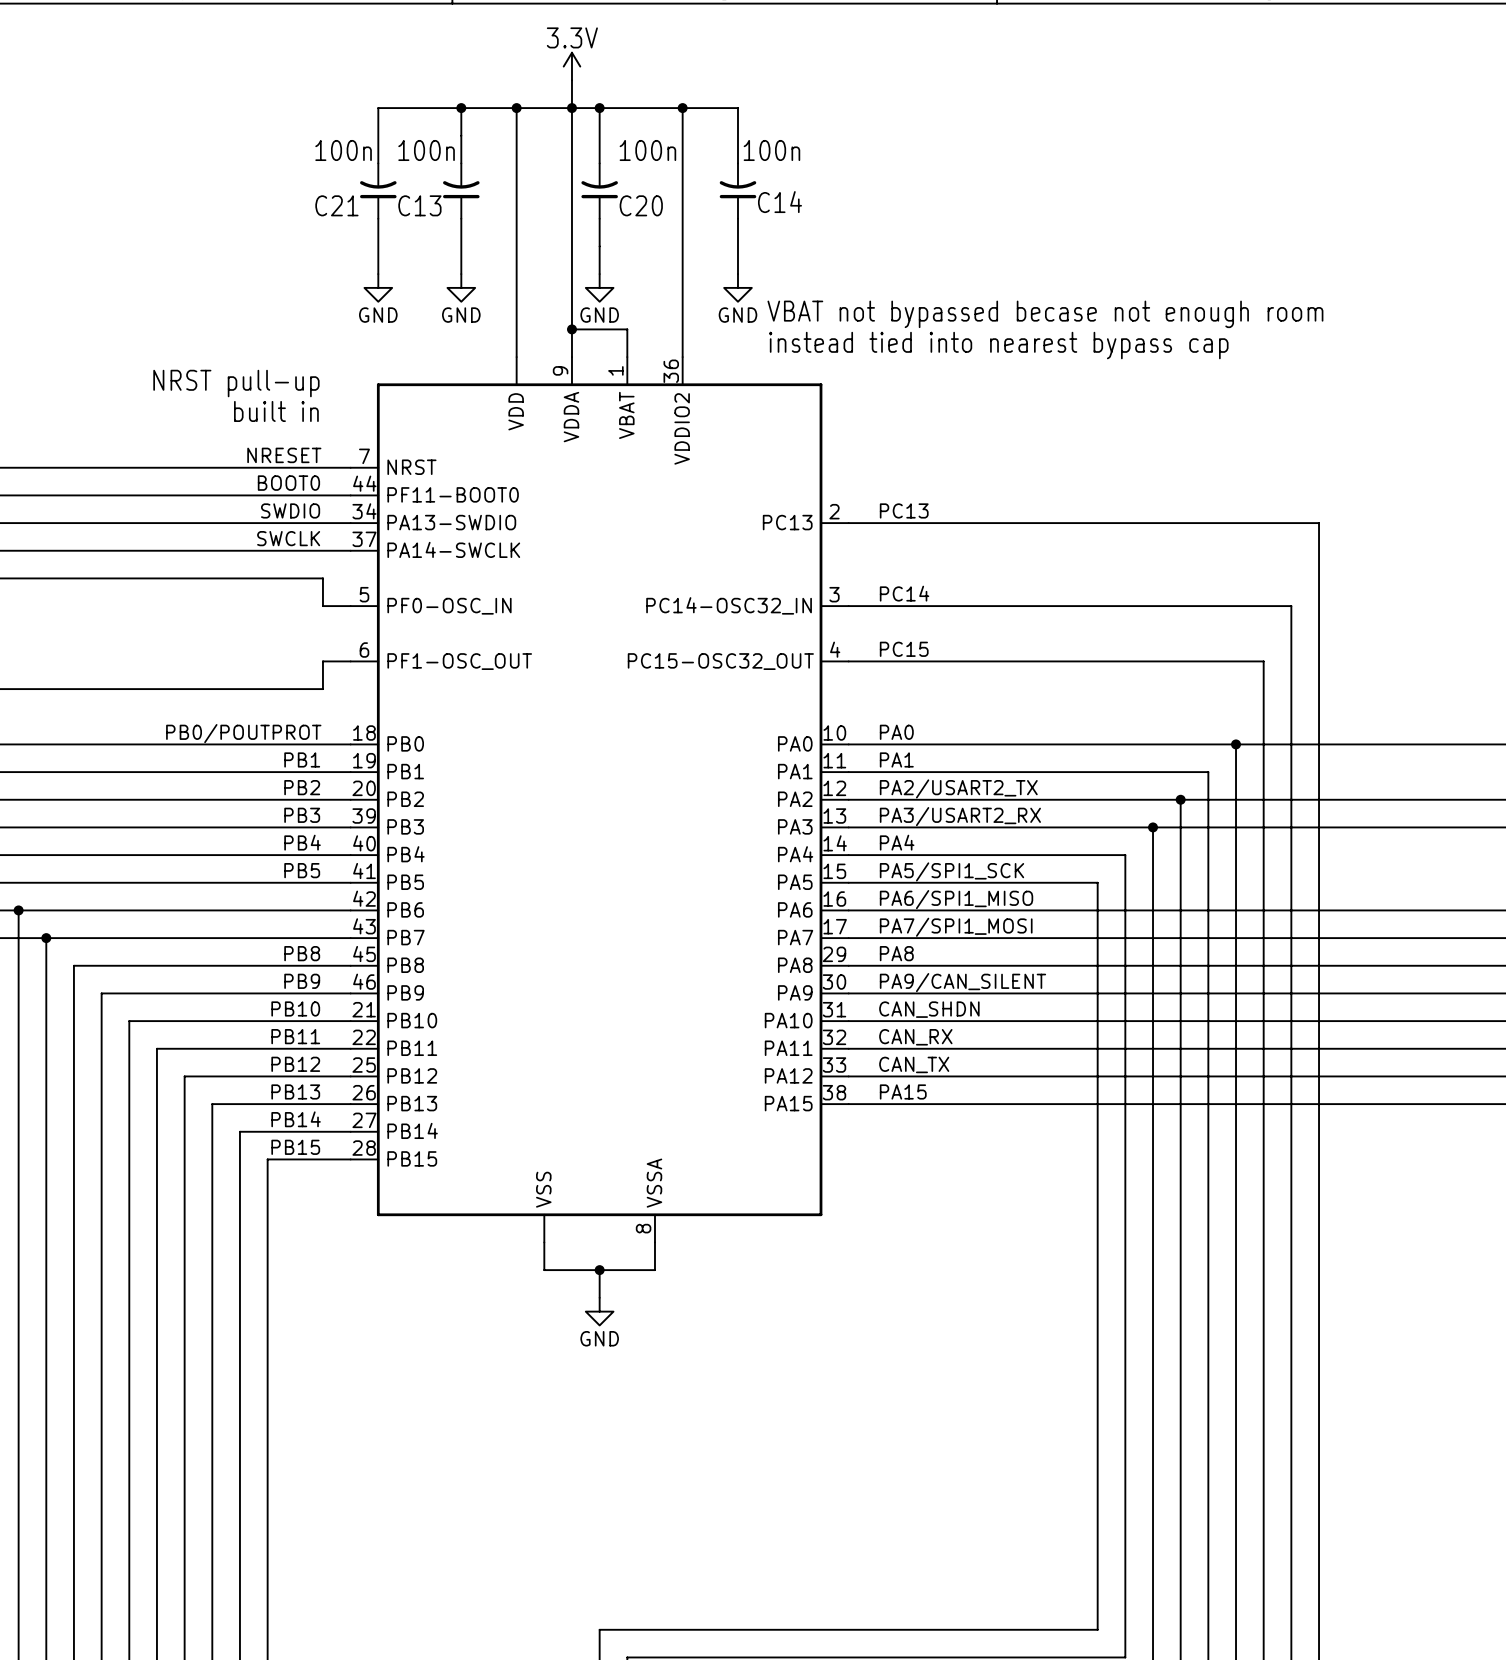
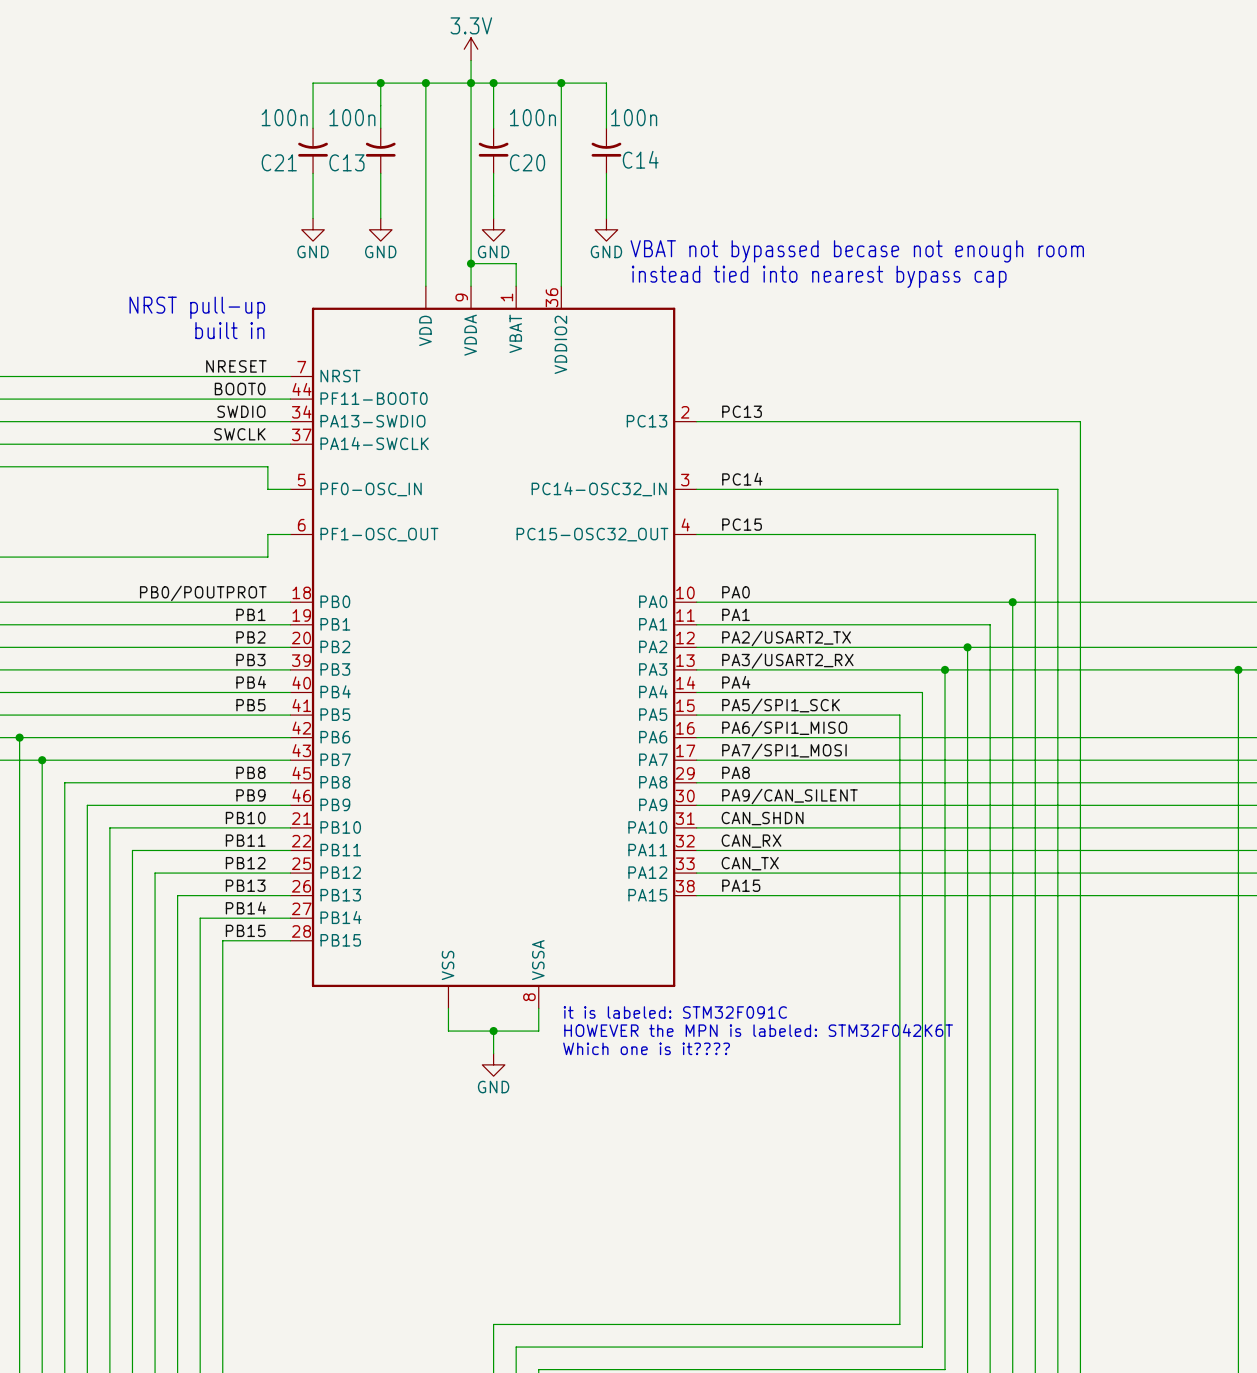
text: none -> it is labeled: STM32F091C (675, 1012)
text: none -> HOWEVER the MPN is labeled: STM32F042K6T (758, 1030)
text: none -> Which one is it???? (646, 1048)

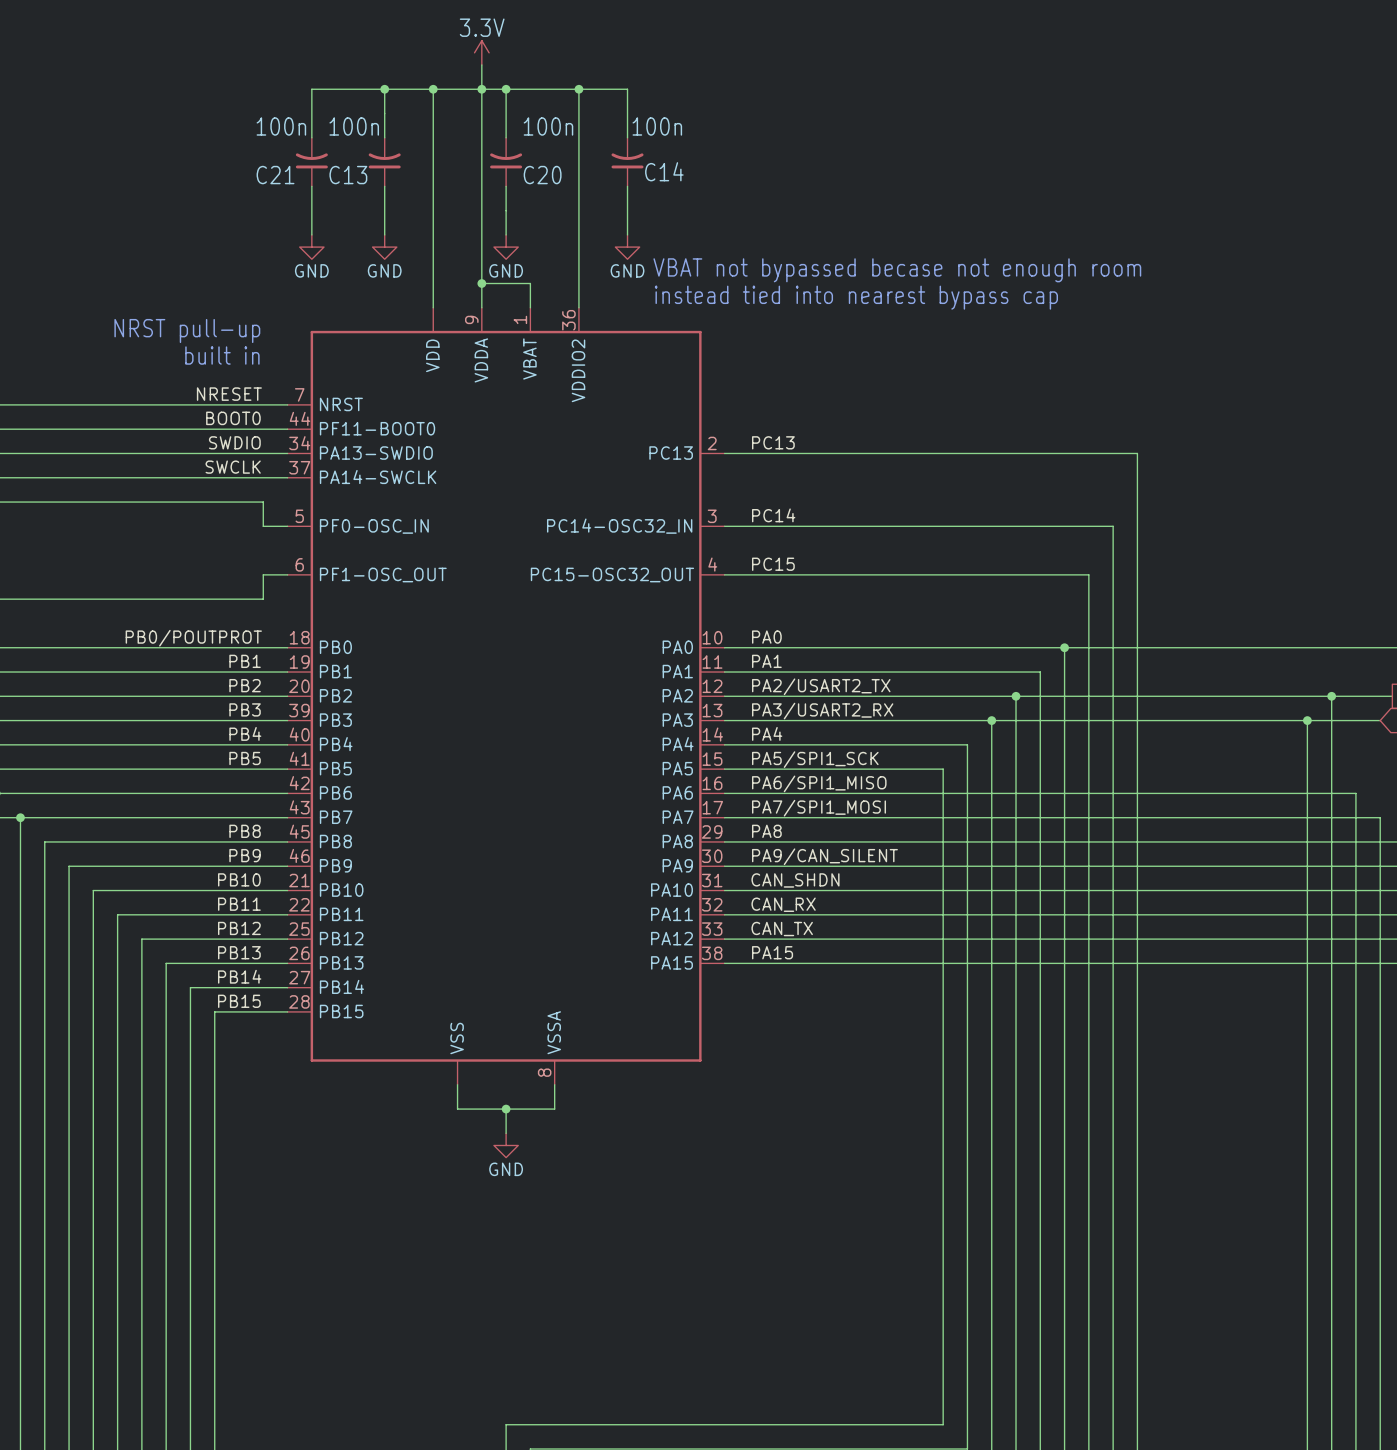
text: it is labeled: STM32F091C (675, 1012) -> none
text: HOWEVER the MPN is labeled: STM32F042K6T (758, 1030) -> none
text: Which one is it???? (646, 1048) -> none

